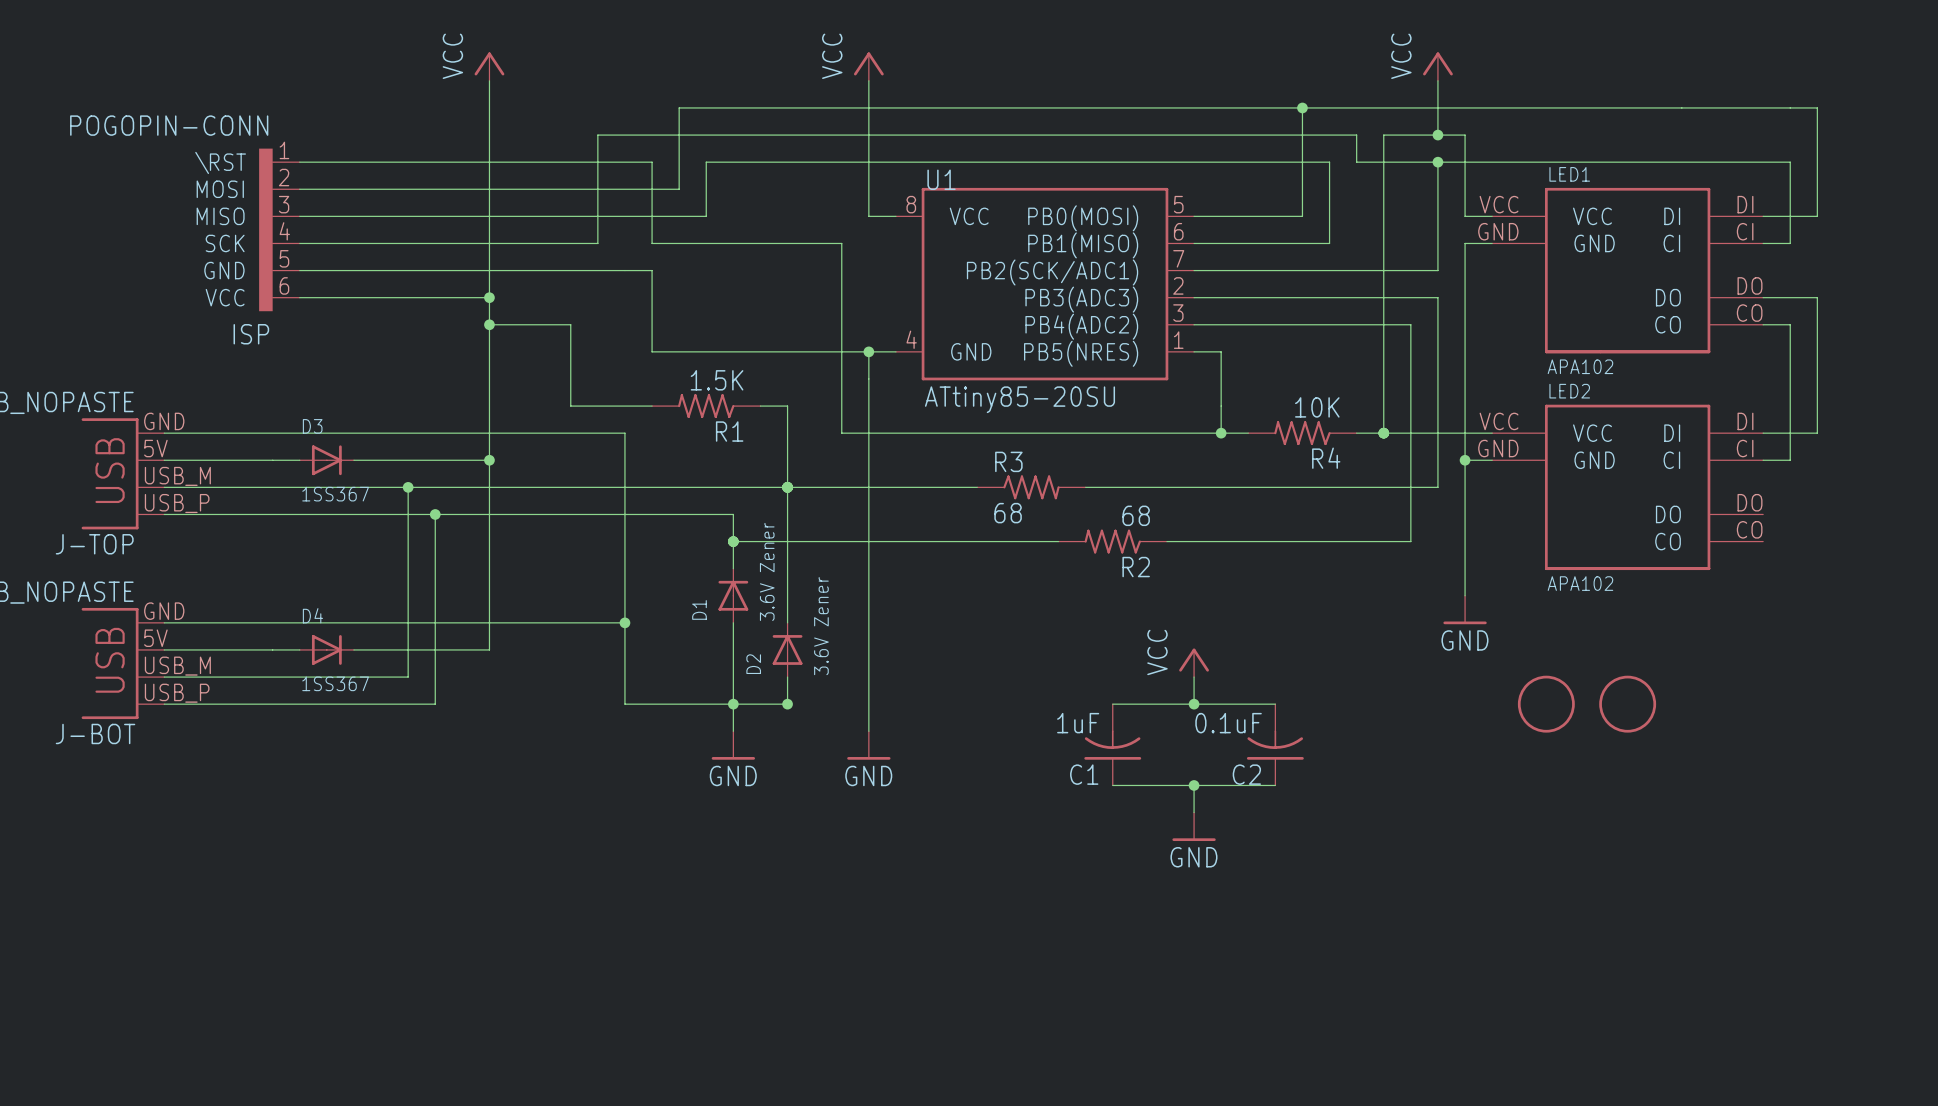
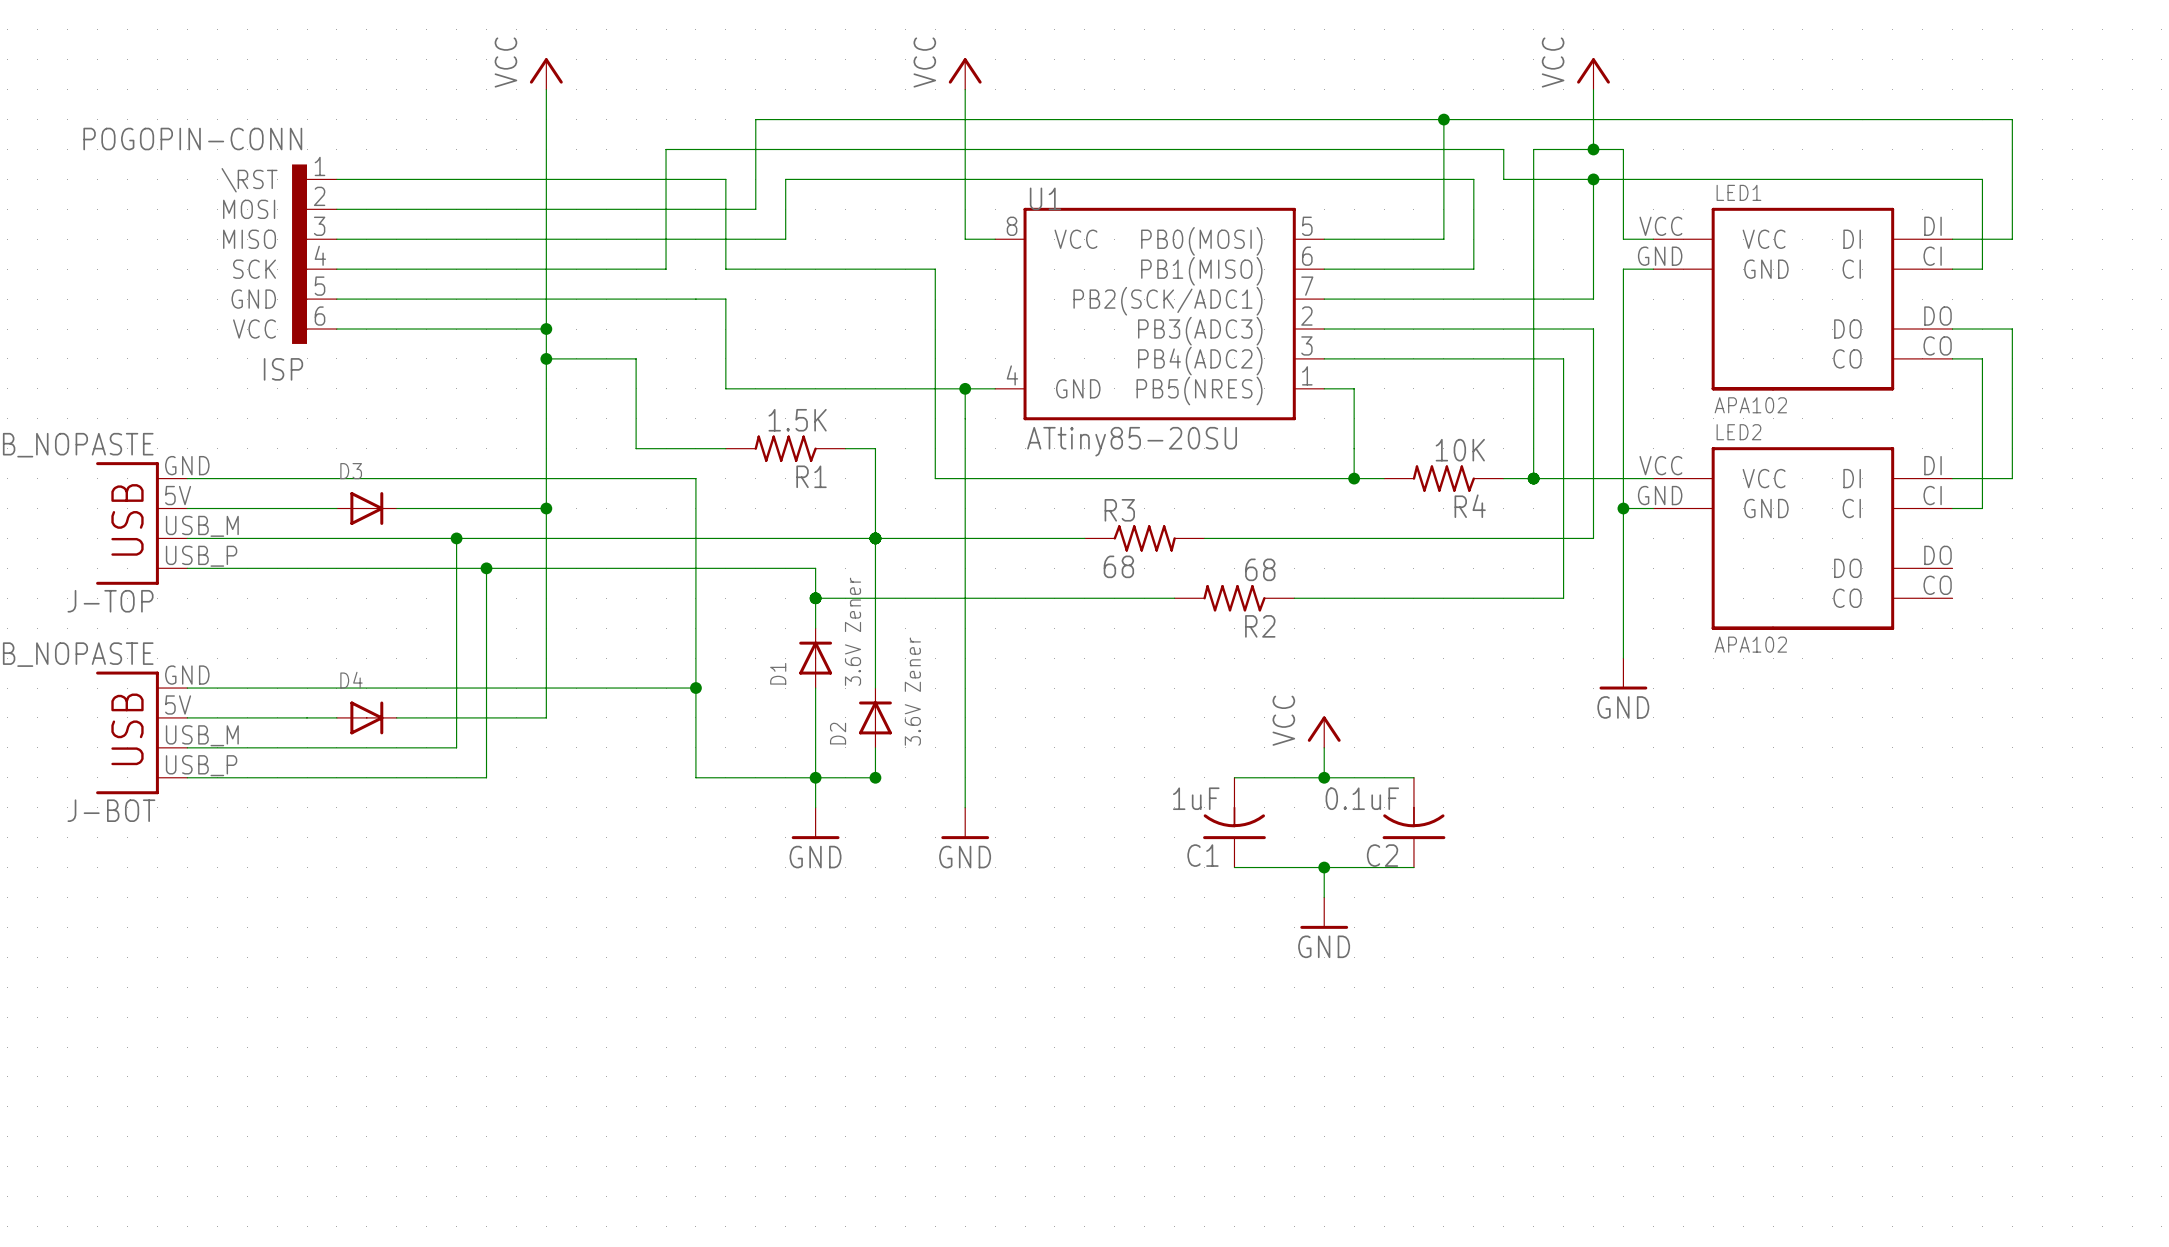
D3 value: 1SS367 (335, 494) -> none
D4 value: 1SS367 (335, 683) -> none
part: (1546, 704) -> none
part: (1627, 704) -> none

